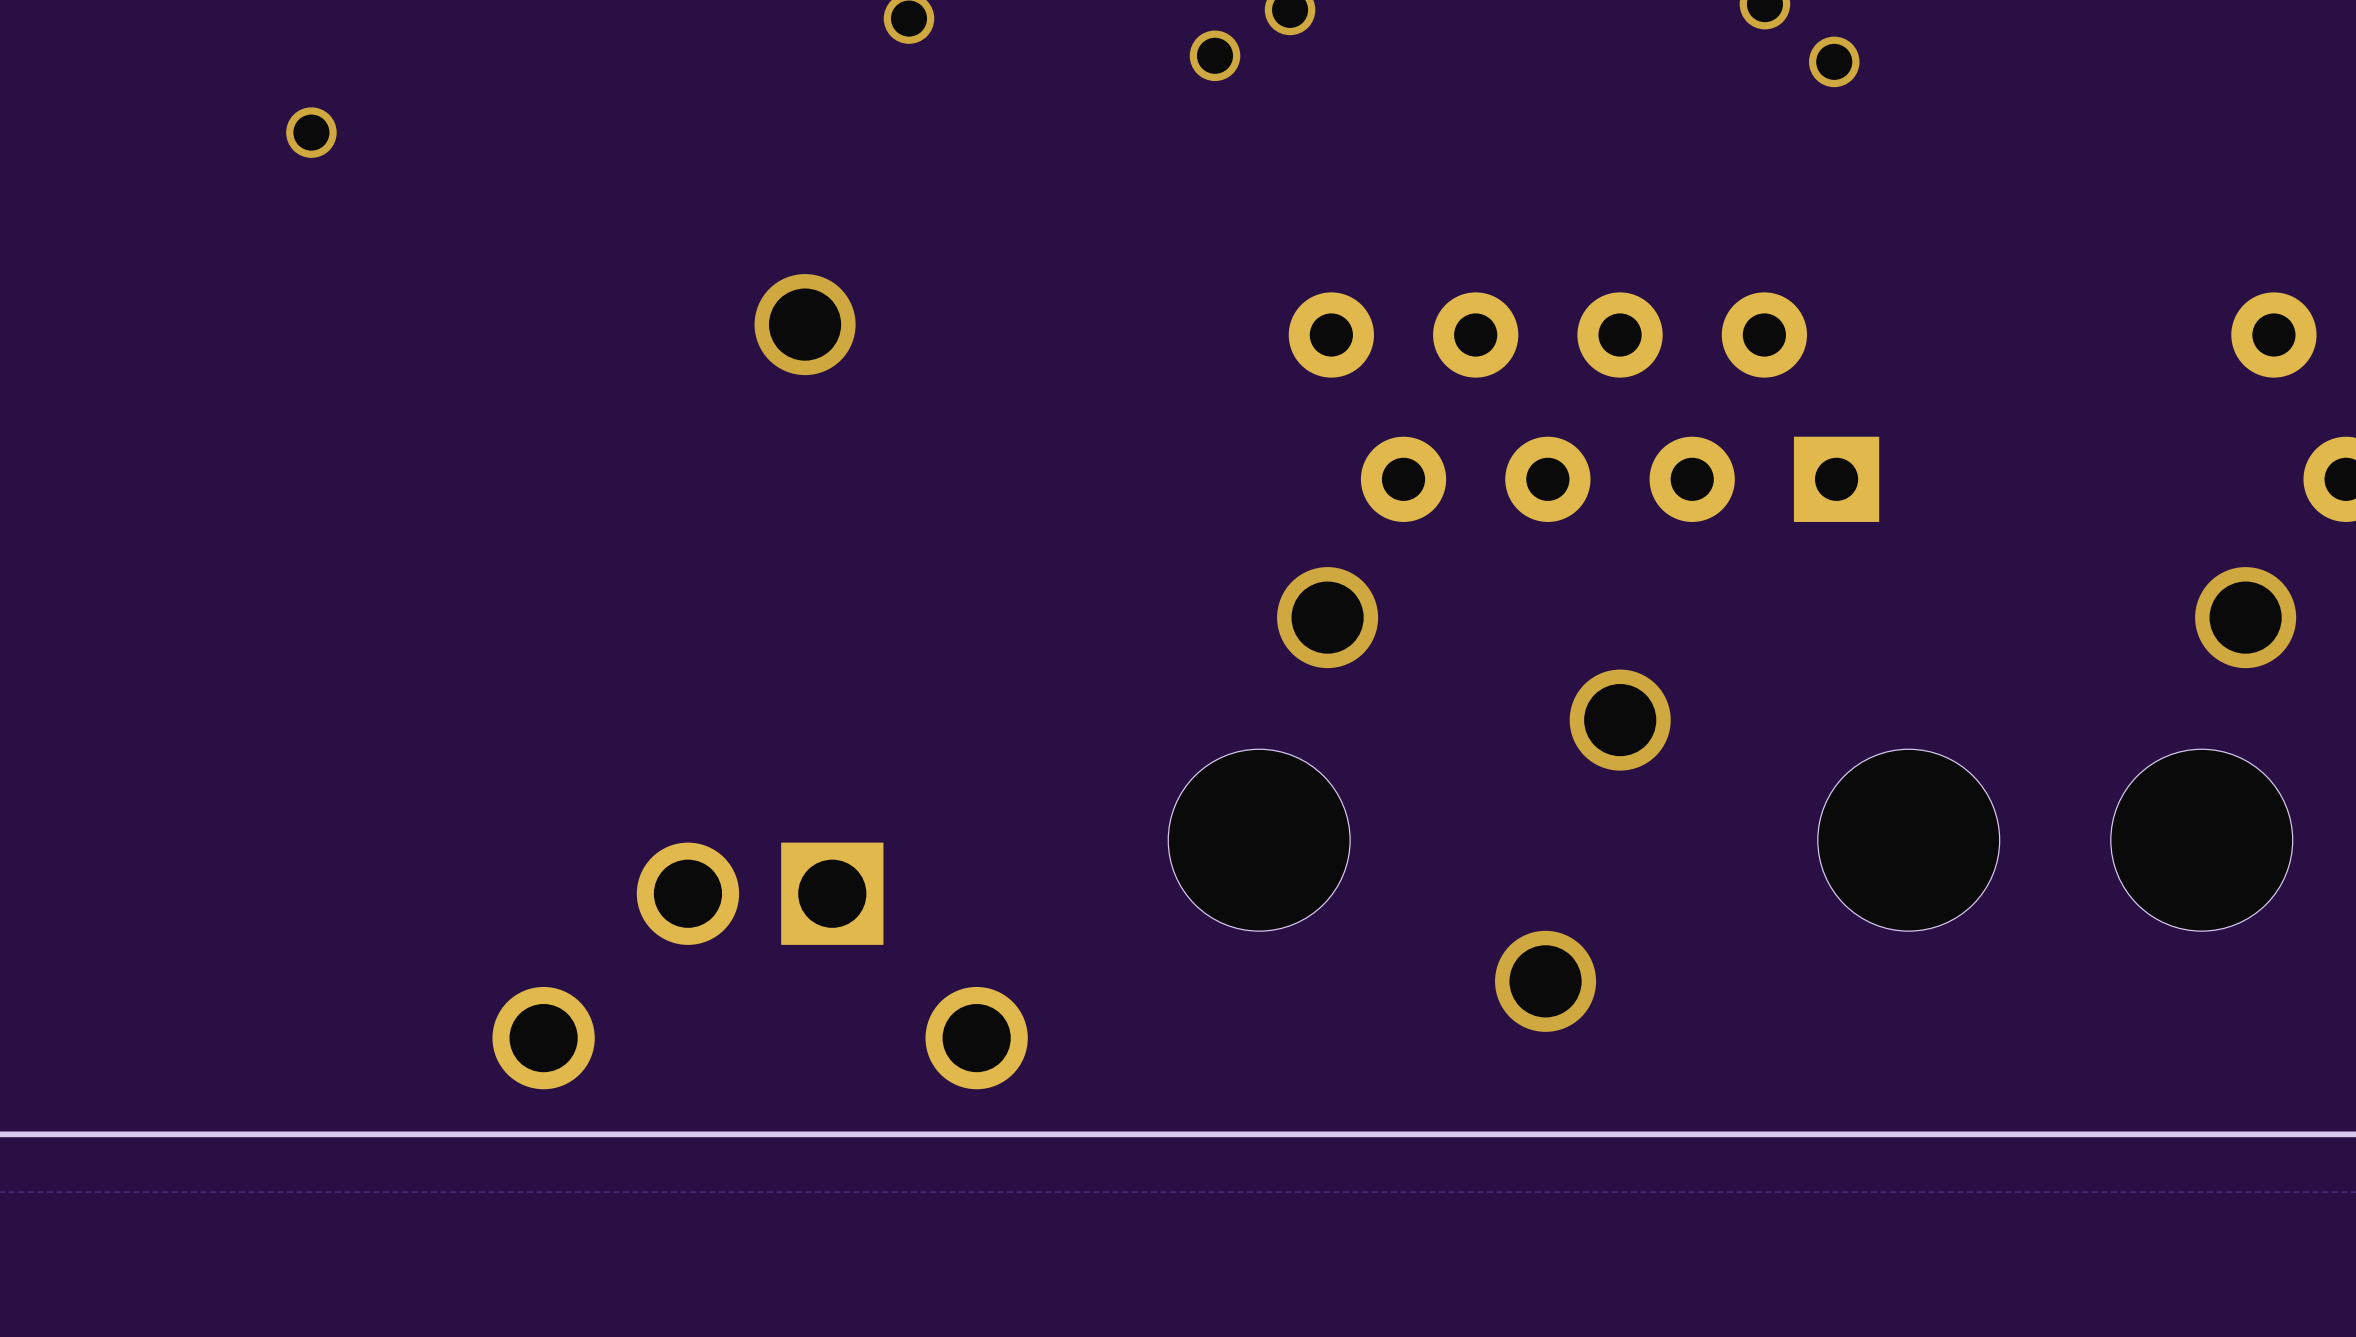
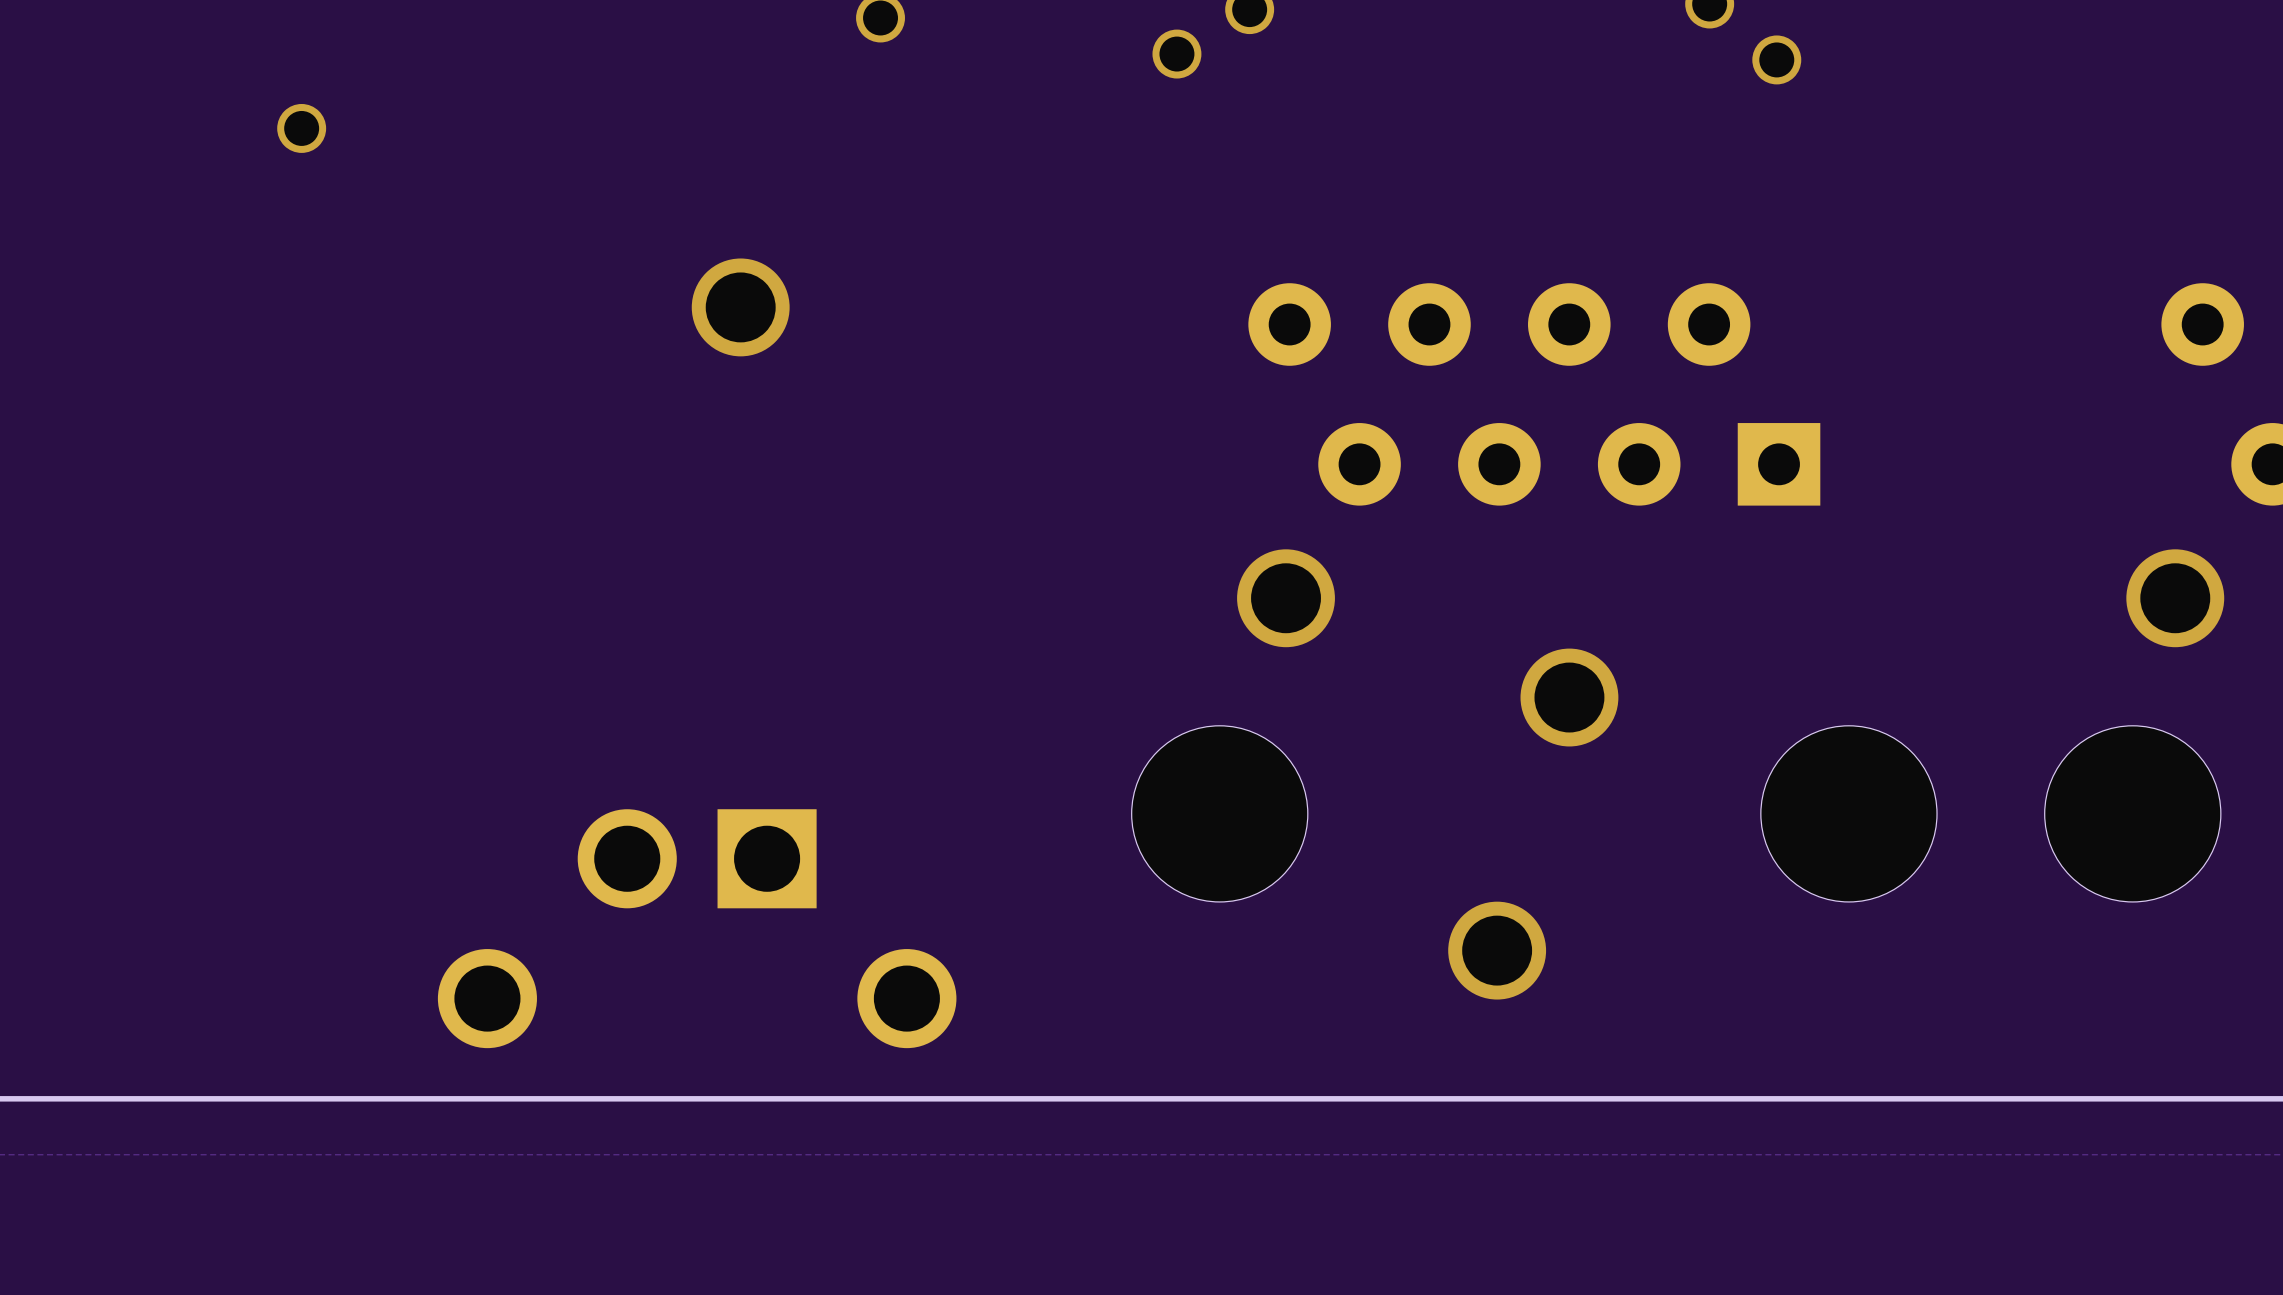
via position: (805, 324) -> (740, 307)
part position: (760, 965) -> (697, 928)

